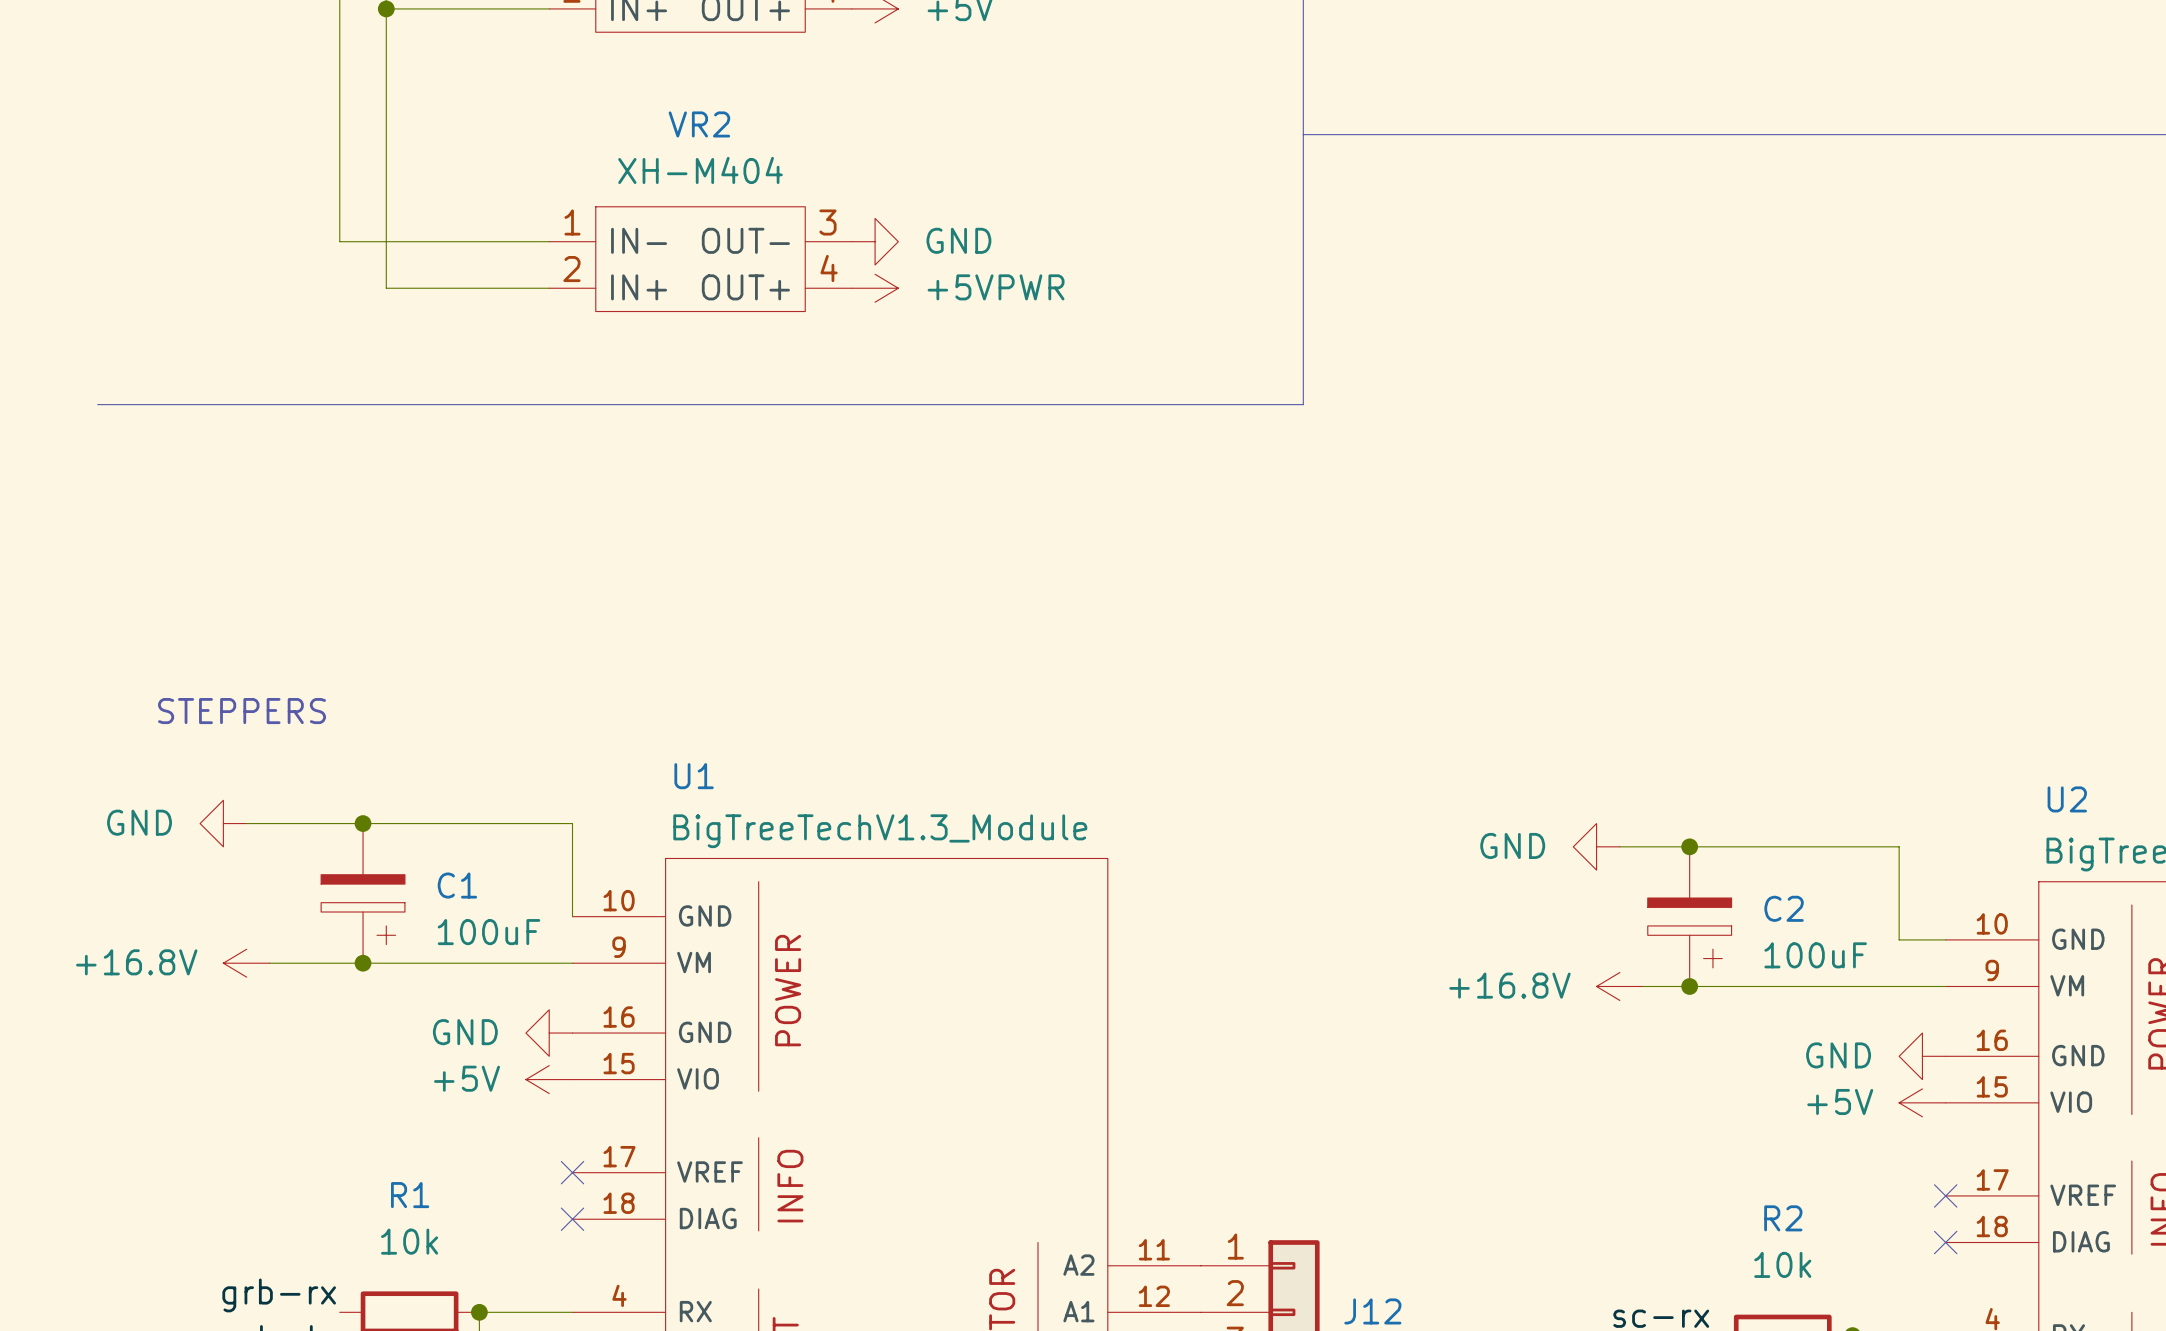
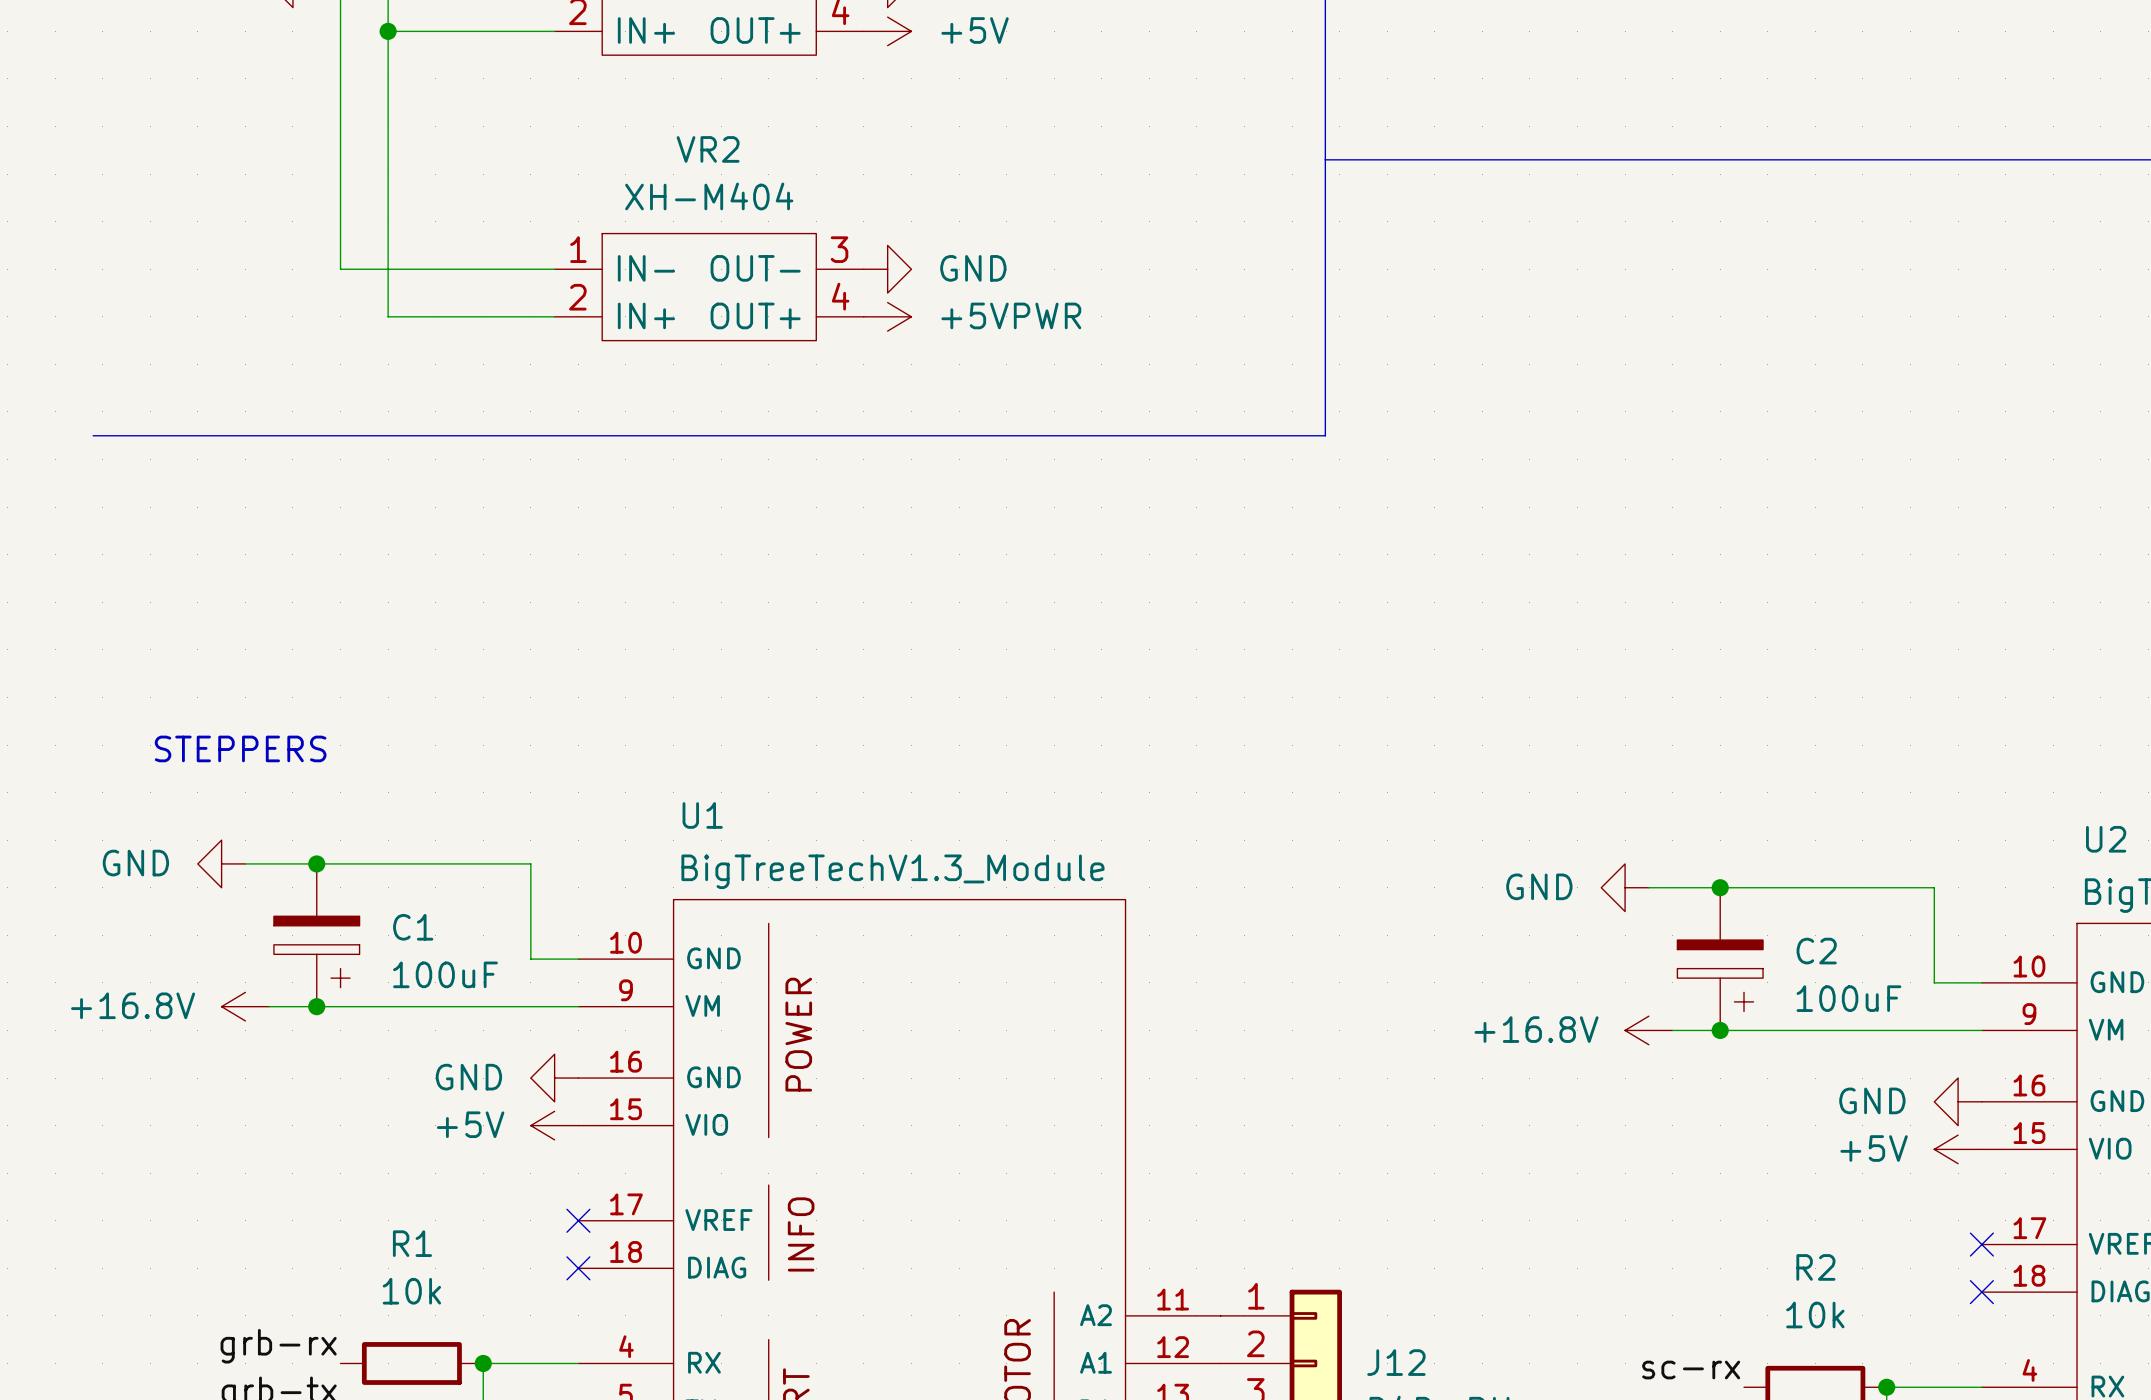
junction position: (363, 823) -> (316, 863)
wire: (525, 823) (572, 823) (572, 916) -> (530, 863) (530, 959) (578, 959)
C1 position: (363, 893) -> (316, 935)
junction position: (363, 963) -> (316, 1006)

